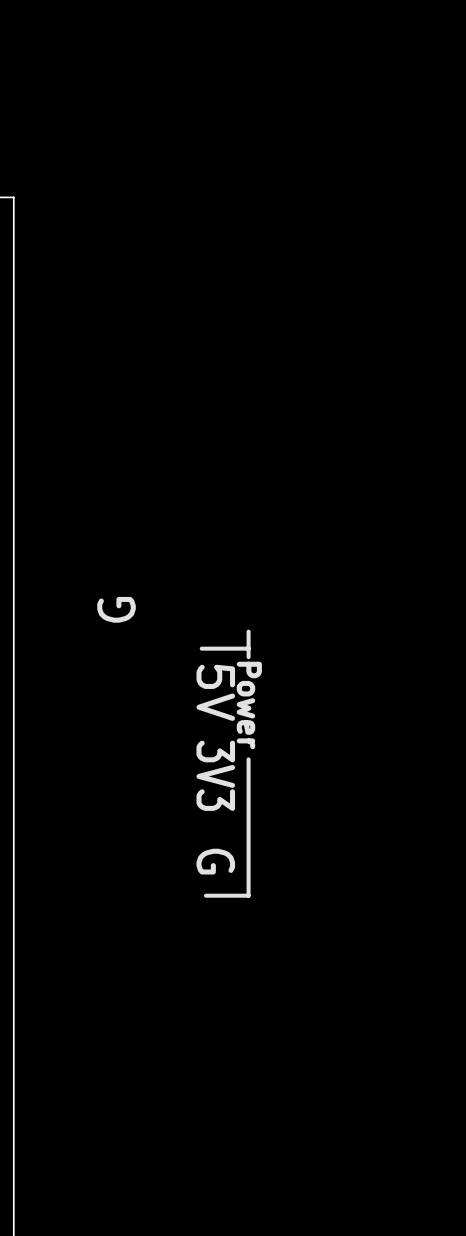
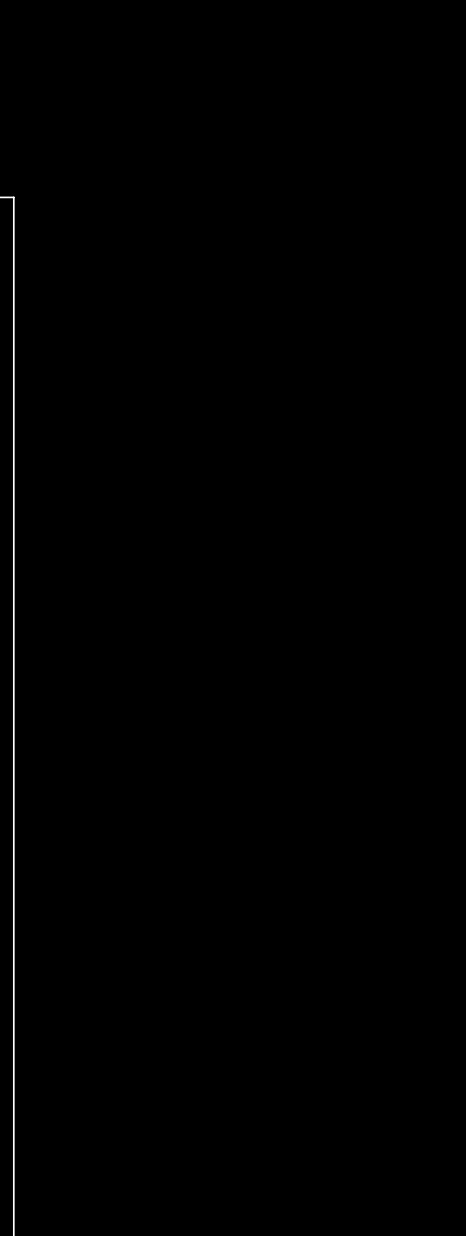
text: G (116, 609) -> none
line: (248, 631) (248, 657) -> none
line: (201, 648) (248, 648) -> none
text: 5V (215, 692) -> none
text: Power (249, 705) -> none
line: (248, 759) (248, 895) (205, 895) -> none
text: 3V3 (215, 775) -> none
text: G (215, 861) -> none

